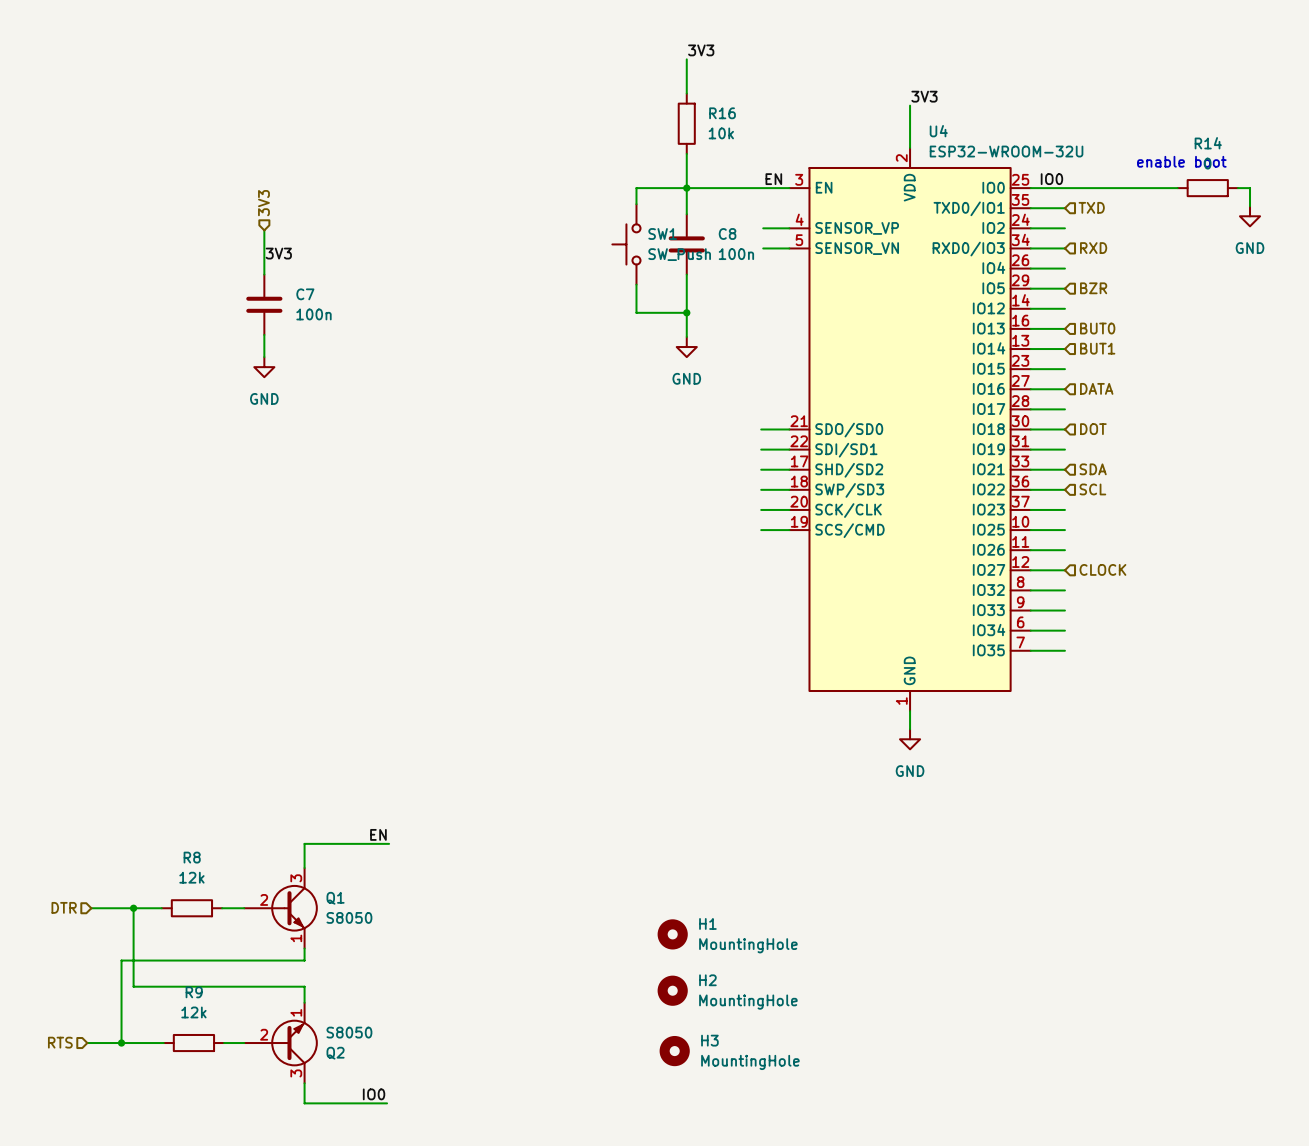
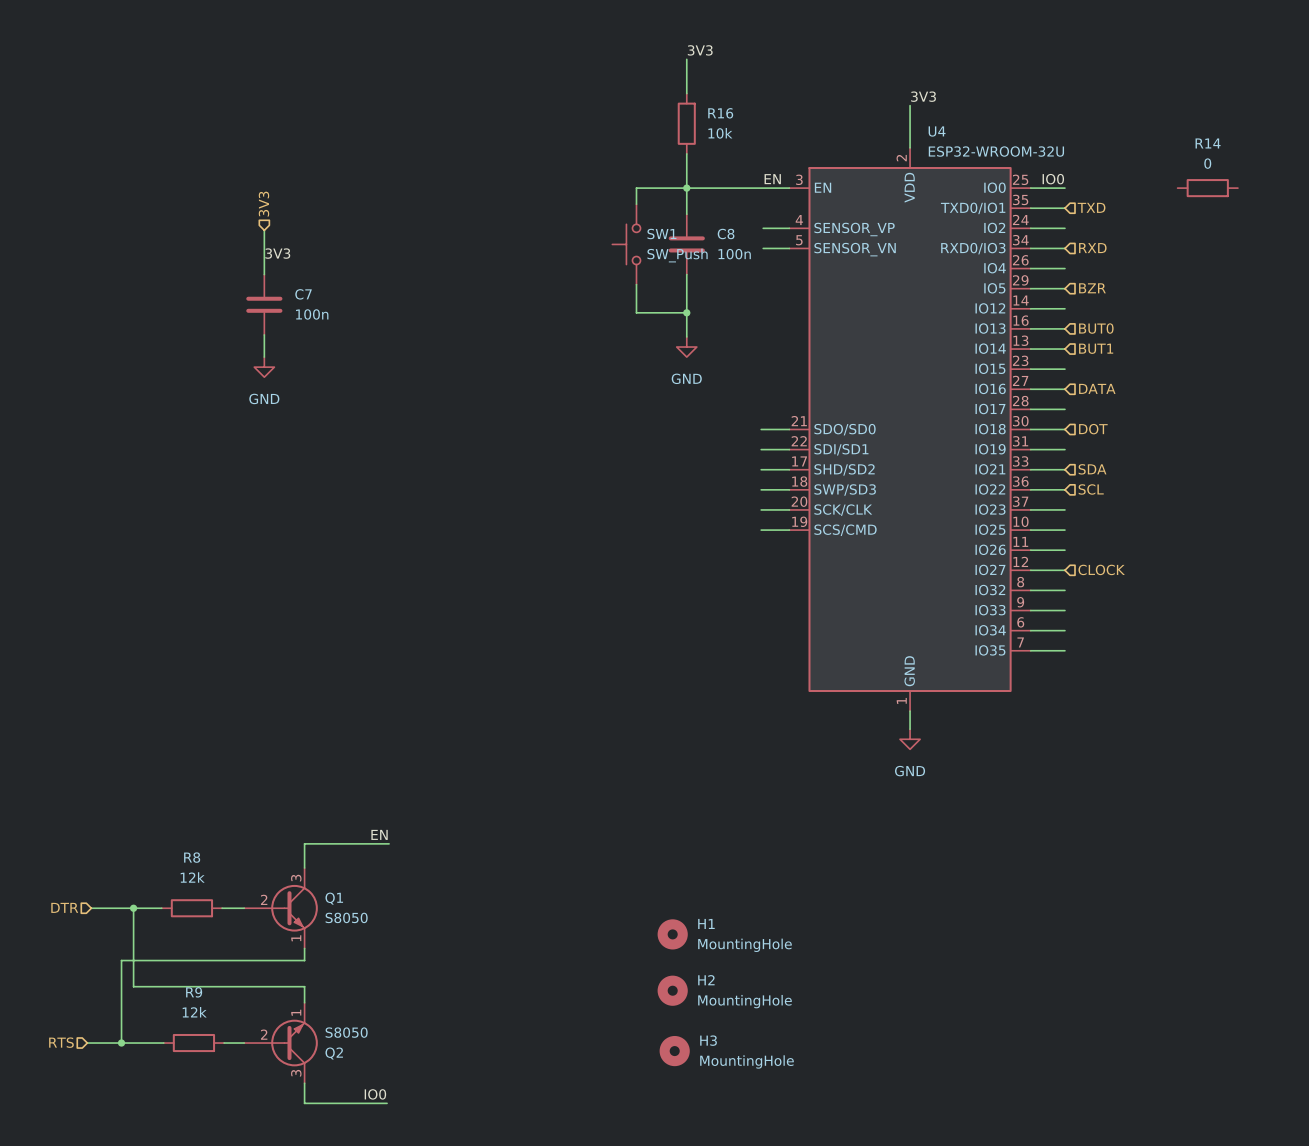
text: enable boot (1181, 161) -> none
wire: (1064, 188) (1177, 188) -> none
wire: (1237, 188) (1250, 188) (1250, 206) -> none
power symbol: GND (1250, 216) -> none

